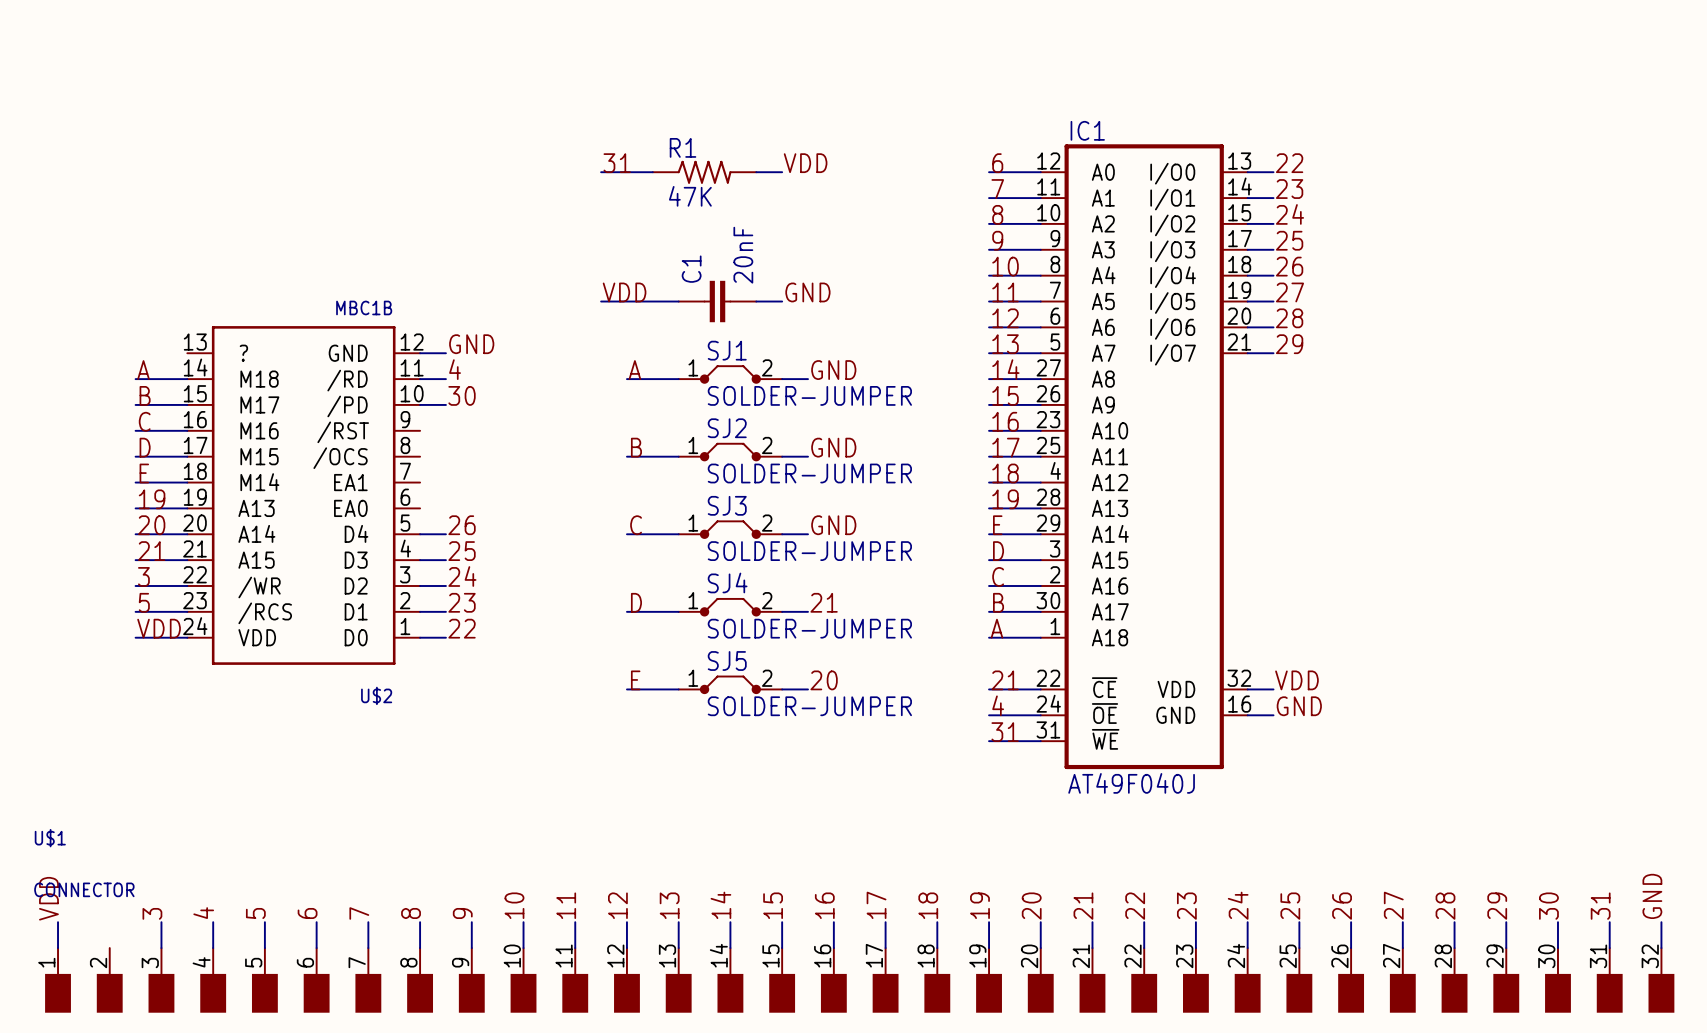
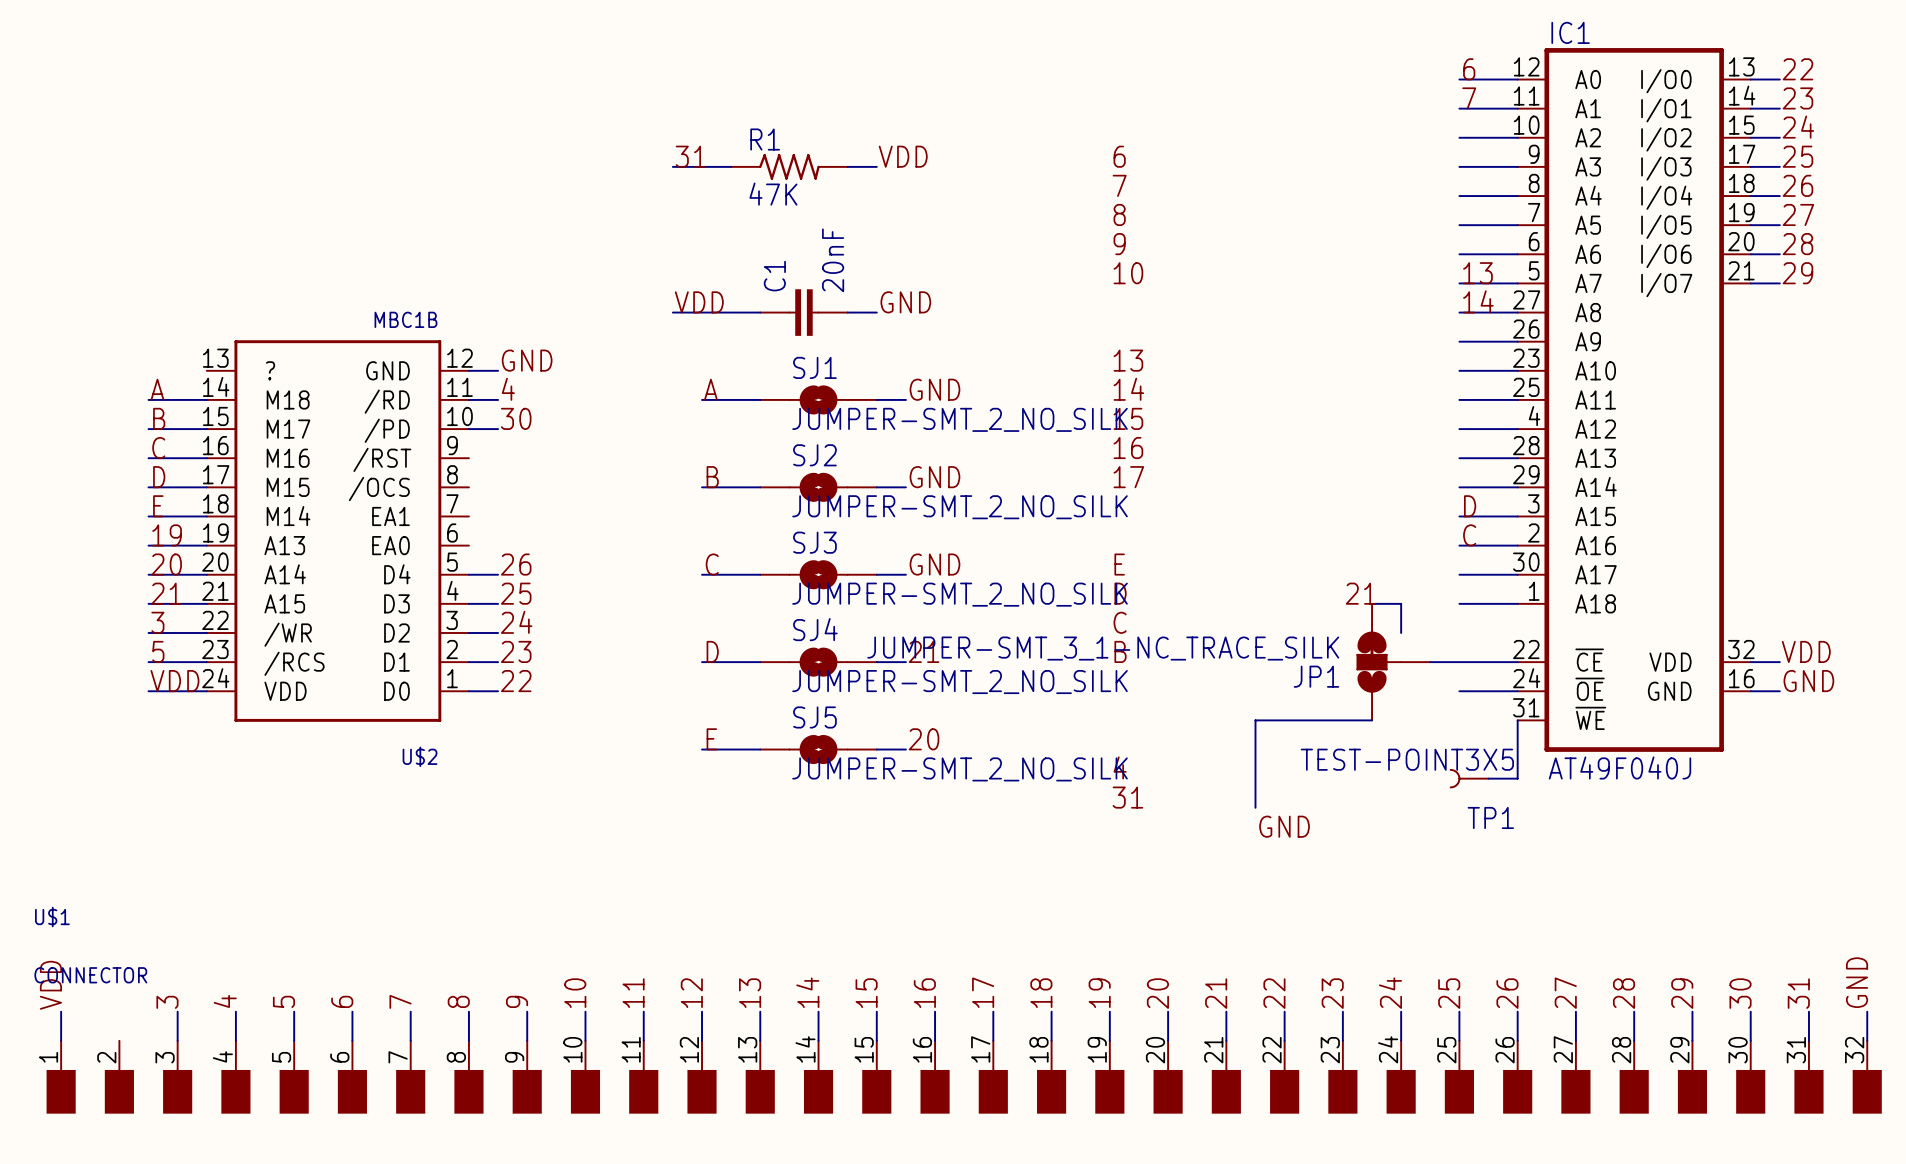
label: none -> 6 (1469, 69)
label: none -> 22 (1797, 69)
wire: none -> (1459, 79) (1517, 79)
wire: none -> (1750, 79) (1779, 79)
label: none -> 7 (1469, 98)
label: none -> 23 (1797, 98)
wire: none -> (1459, 108) (1517, 108)
wire: none -> (1750, 108) (1779, 108)
label: none -> 24 (1798, 127)
wire: none -> (1459, 137) (1517, 137)
wire: none -> (1750, 137) (1779, 137)
label: 22 (1289, 163) -> none
label: none -> 25 (1797, 156)
wire: (989, 172) (1040, 172) -> none
wire: (1247, 172) (1273, 172) -> none
wire: none -> (1459, 166) (1517, 166)
wire: none -> (1750, 166) (1779, 166)
label: 23 (1289, 189) -> none
label: none -> 26 (1797, 185)
wire: (989, 198) (1040, 198) -> none
wire: (1247, 198) (1273, 198) -> none
wire: none -> (1459, 196) (1517, 196)
wire: none -> (1750, 196) (1779, 196)
label: 24 (1289, 214) -> none
label: none -> 27 (1798, 214)
wire: (989, 223) (1040, 223) -> none
wire: (1247, 223) (1273, 223) -> none
wire: none -> (1459, 225) (1517, 225)
wire: none -> (1750, 225) (1779, 225)
label: 25 (1289, 240) -> none
label: none -> 28 (1797, 244)
wire: (989, 249) (1040, 249) -> none
wire: (1247, 249) (1273, 249) -> none
wire: none -> (1459, 254) (1517, 254)
wire: none -> (1750, 254) (1779, 254)
label: 26 (1289, 266) -> none
label: none -> 13 (1477, 273)
label: none -> 29 (1797, 273)
wire: (989, 275) (1040, 275) -> none
wire: (1247, 275) (1273, 275) -> none
wire: none -> (1459, 283) (1517, 283)
wire: none -> (1750, 283) (1779, 283)
label: 11 (1005, 292) -> none
label: 27 (1289, 292) -> none
label: none -> 14 (1478, 301)
wire: (989, 301) (1040, 301) -> none
wire: (1247, 301) (1273, 301) -> none
wire: none -> (1459, 312) (1517, 312)
label: 12 (1005, 318) -> none
label: 28 (1289, 318) -> none
wire: (989, 327) (1040, 327) -> none
wire: (1247, 327) (1273, 327) -> none
wire: none -> (1459, 341) (1517, 341)
label: 29 (1289, 344) -> none
wire: (989, 353) (1040, 353) -> none
wire: (1247, 353) (1273, 353) -> none
wire: none -> (1459, 370) (1517, 370)
SJ1 symbol: [678, 365, 783, 384] -> [760, 385, 877, 415]
wire: (989, 379) (1040, 379) -> none
wire: none -> (1459, 399) (1517, 399)
SJ1 value: SOLDER-JUMPER (809, 395) -> JUMPER-SMT_2_NO_SILK (960, 419)
wire: (989, 404) (1040, 404) -> none
wire: none -> (1459, 429) (1517, 429)
wire: (989, 430) (1040, 430) -> none
wire: none -> (1459, 458) (1517, 458)
SJ2 symbol: [678, 442, 783, 462] -> [760, 472, 877, 502]
wire: (989, 456) (1040, 456) -> none
IC1 position: (1144, 456) -> (1634, 399)
wire: none -> (1459, 487) (1517, 487)
SJ2 value: SOLDER-JUMPER (809, 473) -> JUMPER-SMT_2_NO_SILK (960, 507)
label: 18 (1005, 473) -> none
label: none -> D (1470, 506)
wire: (989, 482) (1040, 482) -> none
wire: none -> (1459, 516) (1517, 516)
label: 19 (1005, 499) -> none
label: none -> C (1469, 535)
wire: (989, 508) (1040, 508) -> none
wire: none -> (1459, 545) (1517, 545)
SJ3 symbol: [678, 520, 783, 539] -> [760, 560, 877, 590]
wire: (989, 534) (1040, 534) -> none
wire: none -> (1459, 574) (1517, 574)
SJ3 value: SOLDER-JUMPER (809, 551) -> JUMPER-SMT_2_NO_SILK (960, 594)
wire: (989, 560) (1040, 560) -> none
wire: none -> (1372, 603) (1401, 603) (1401, 633)
wire: none -> (1459, 603) (1517, 603)
wire: (989, 585) (1040, 585) -> none
SJ4 symbol: [678, 598, 783, 617] -> [760, 647, 877, 677]
label: none -> VDD (1806, 651)
wire: (989, 611) (1040, 611) -> none
JP1: none -> JUMPER-SMT_3_1-NC_TRACE_SILK (1393, 662)
wire: none -> (1430, 662) (1517, 662)
wire: none -> (1750, 662) (1779, 662)
SJ4 value: SOLDER-JUMPER (809, 628) -> JUMPER-SMT_2_NO_SILK (960, 682)
label: A (996, 628) -> none
label: none -> GND (1808, 681)
wire: (989, 637) (1040, 637) -> none
wire: none -> (1459, 691) (1517, 691)
wire: none -> (1750, 691) (1779, 691)
wire: none -> (1372, 720) (1255, 720) (1255, 807)
wire: none -> (1517, 720) (1517, 778) (1488, 778)
SJ5 symbol: [678, 675, 783, 695] -> [760, 734, 877, 765]
label position: 21 (1005, 680) -> 21 (1361, 593)
label: VDD (1296, 680) -> none
wire: (989, 689) (1040, 689) -> none
wire: (1247, 689) (1273, 689) -> none
SJ5 value: SOLDER-JUMPER (809, 706) -> JUMPER-SMT_2_NO_SILK (960, 769)
label: GND (1299, 706) -> none
wire: (989, 715) (1040, 715) -> none
wire: (1247, 715) (1273, 715) -> none
TP1: none -> TEST-POINT3X5 (1469, 778)
wire: (989, 741) (1040, 741) -> none
label: none -> GND (1284, 826)

